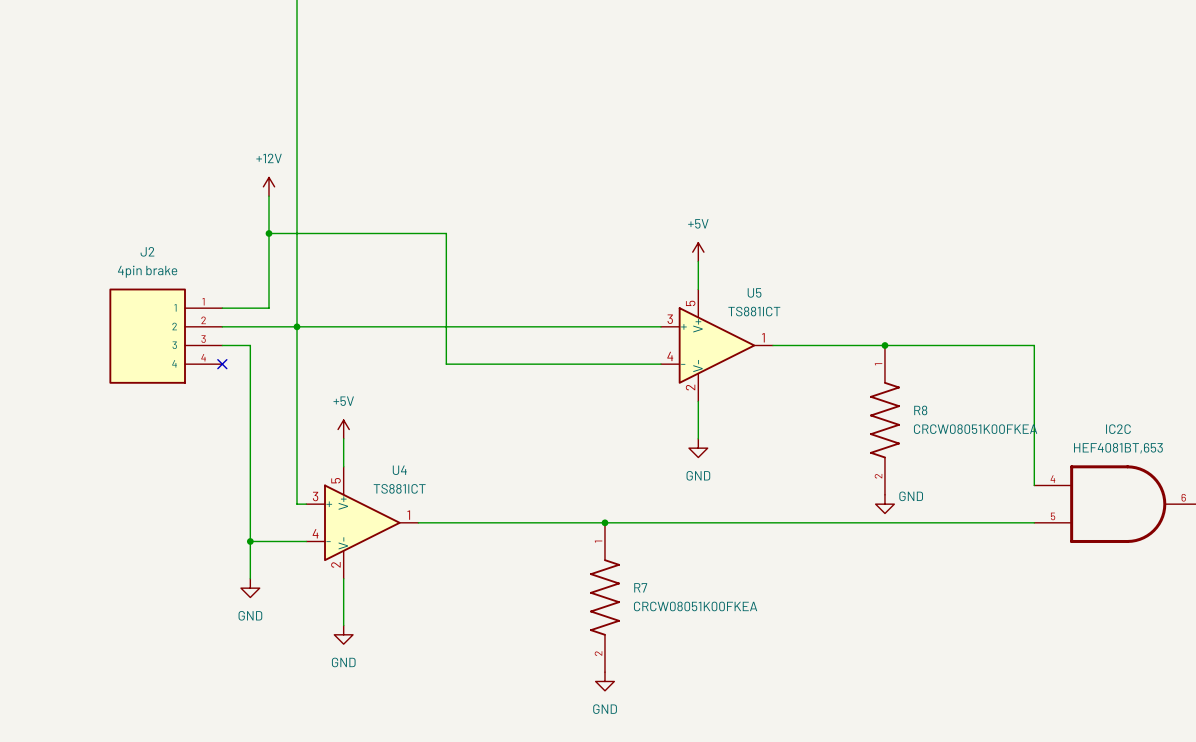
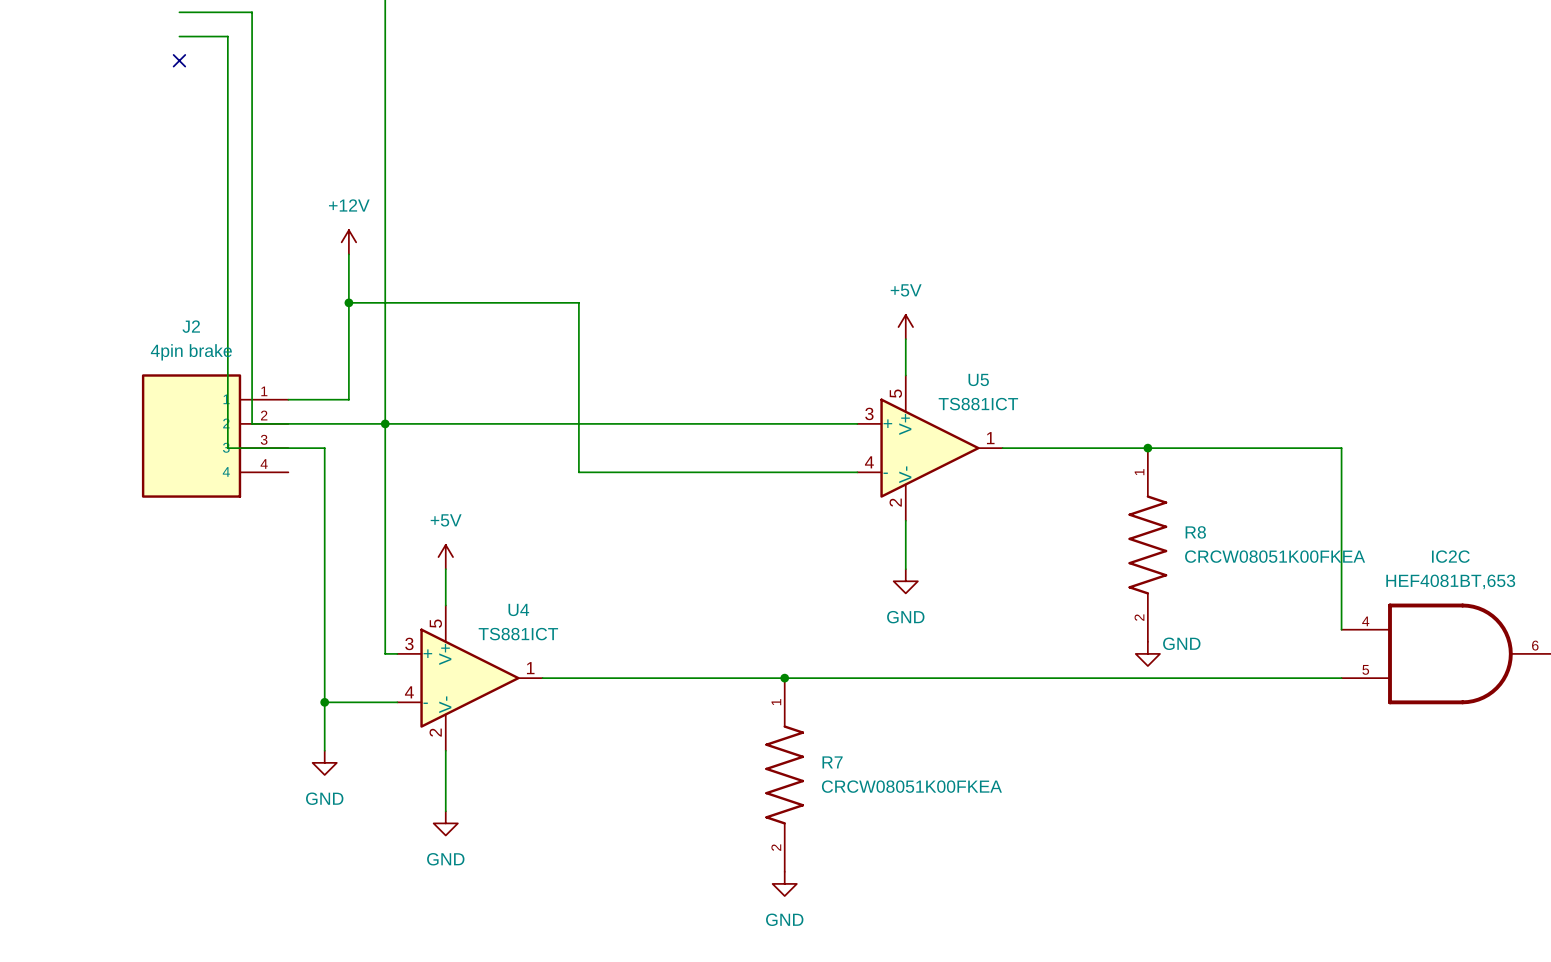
wire: none -> (179, 12) (252, 12) (252, 423) (288, 423)
wire: none -> (179, 36) (227, 36) (227, 448) (288, 448)
no-connect mark: none -> (179, 60)
no-connect mark: (222, 364) -> none

